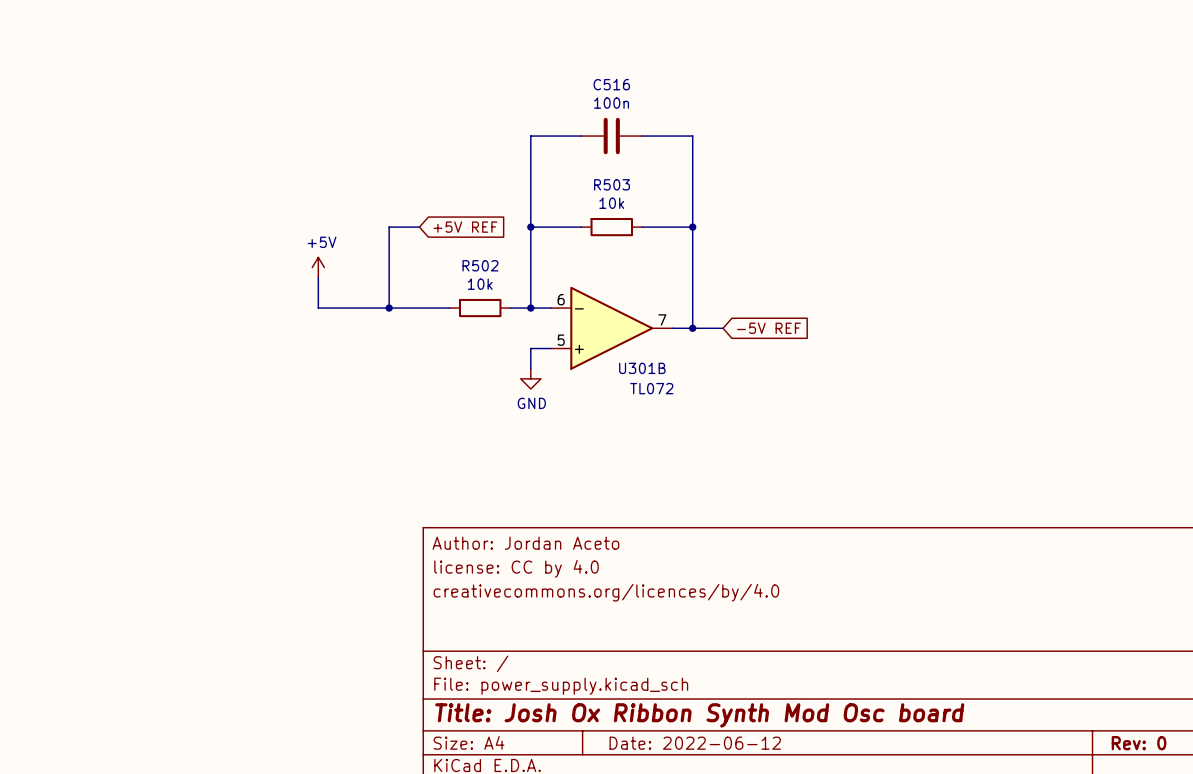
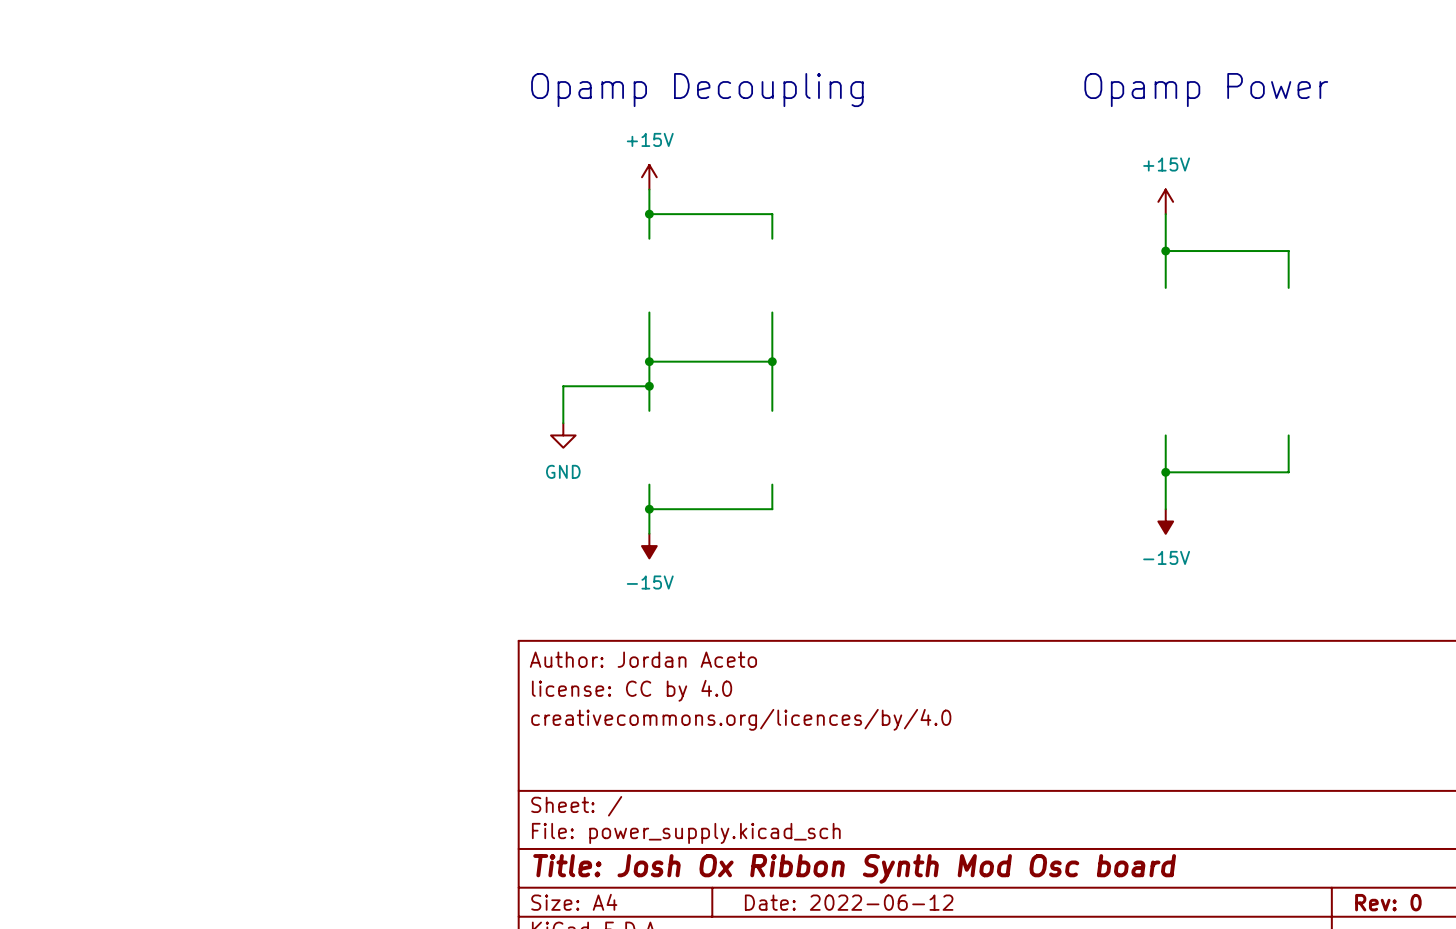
text: none -> Opamp Decoupling (697, 90)
text: none -> Opamp Power (1206, 90)
wire: (581, 136) (530, 136) (530, 156) -> none
C516: 100n (611, 136) -> none
wire: (642, 136) (692, 136) (692, 328) -> none
power symbol: none -> +15V (649, 177)
power symbol: none -> +15V (1165, 201)
wire: none -> (649, 214) (772, 214) (772, 238)
junction: none -> (649, 214)
wire: none -> (1165, 214) (1165, 287)
wire: (530, 196) (530, 257) -> none
wire: none -> (1165, 251) (1288, 251) (1288, 287)
junction: none -> (1165, 251)
wire: (419, 227) (389, 227) (389, 308) -> none
global label: +5V REF (465, 227) -> none
wire: (530, 227) (581, 227) -> none
junction: (530, 227) -> none
R503: 10k (611, 227) -> none
wire: (642, 227) (692, 227) -> none
junction: (692, 227) -> none
wire: none -> (772, 312) (772, 410)
power symbol: +5V (318, 267) -> none
wire: (318, 277) (318, 308) (449, 308) -> none
wire: none -> (649, 361) (772, 361)
junction: none -> (649, 361)
junction: none -> (772, 361)
junction: (389, 308) -> none
R502: 10k (480, 308) -> none
wire: (510, 308) (551, 308) -> none
wire: none -> (649, 373) (649, 410)
junction: (530, 308) -> none
wire: none -> (649, 386) (563, 386) (563, 423)
junction: none -> (649, 386)
U301B: TL072 (611, 328) -> none
wire: (672, 328) (723, 328) -> none
junction: (692, 328) -> none
global label: -5V REF (768, 328) -> none
wire: (551, 348) (530, 348) (530, 368) -> none
wire: none -> (1165, 435) (1165, 509)
wire: none -> (1288, 435) (1288, 472) (1165, 472)
power symbol position: GND (530, 378) -> GND (563, 435)
junction: none -> (1165, 472)
wire: none -> (649, 484) (649, 533)
wire: none -> (772, 484) (772, 509) (649, 509)
power symbol text position: GND (531, 403) -> GND (563, 471)
junction: none -> (649, 509)
power symbol: none -> -15V (1165, 521)
power symbol: none -> -15V (649, 546)

